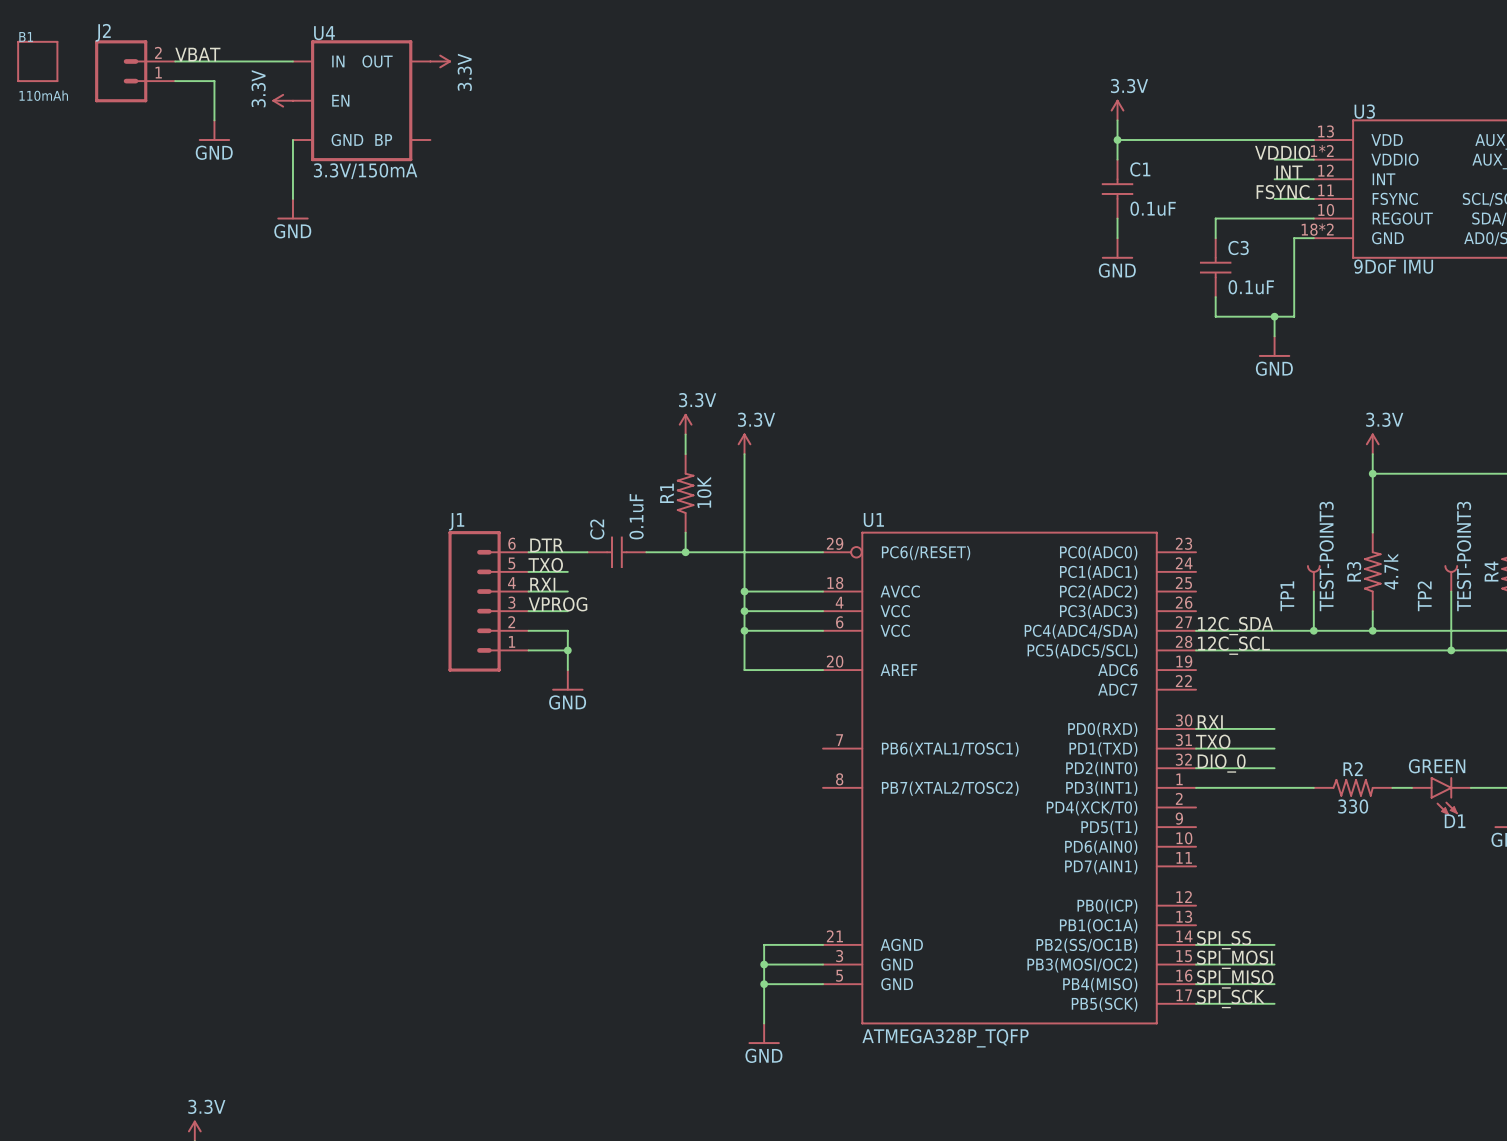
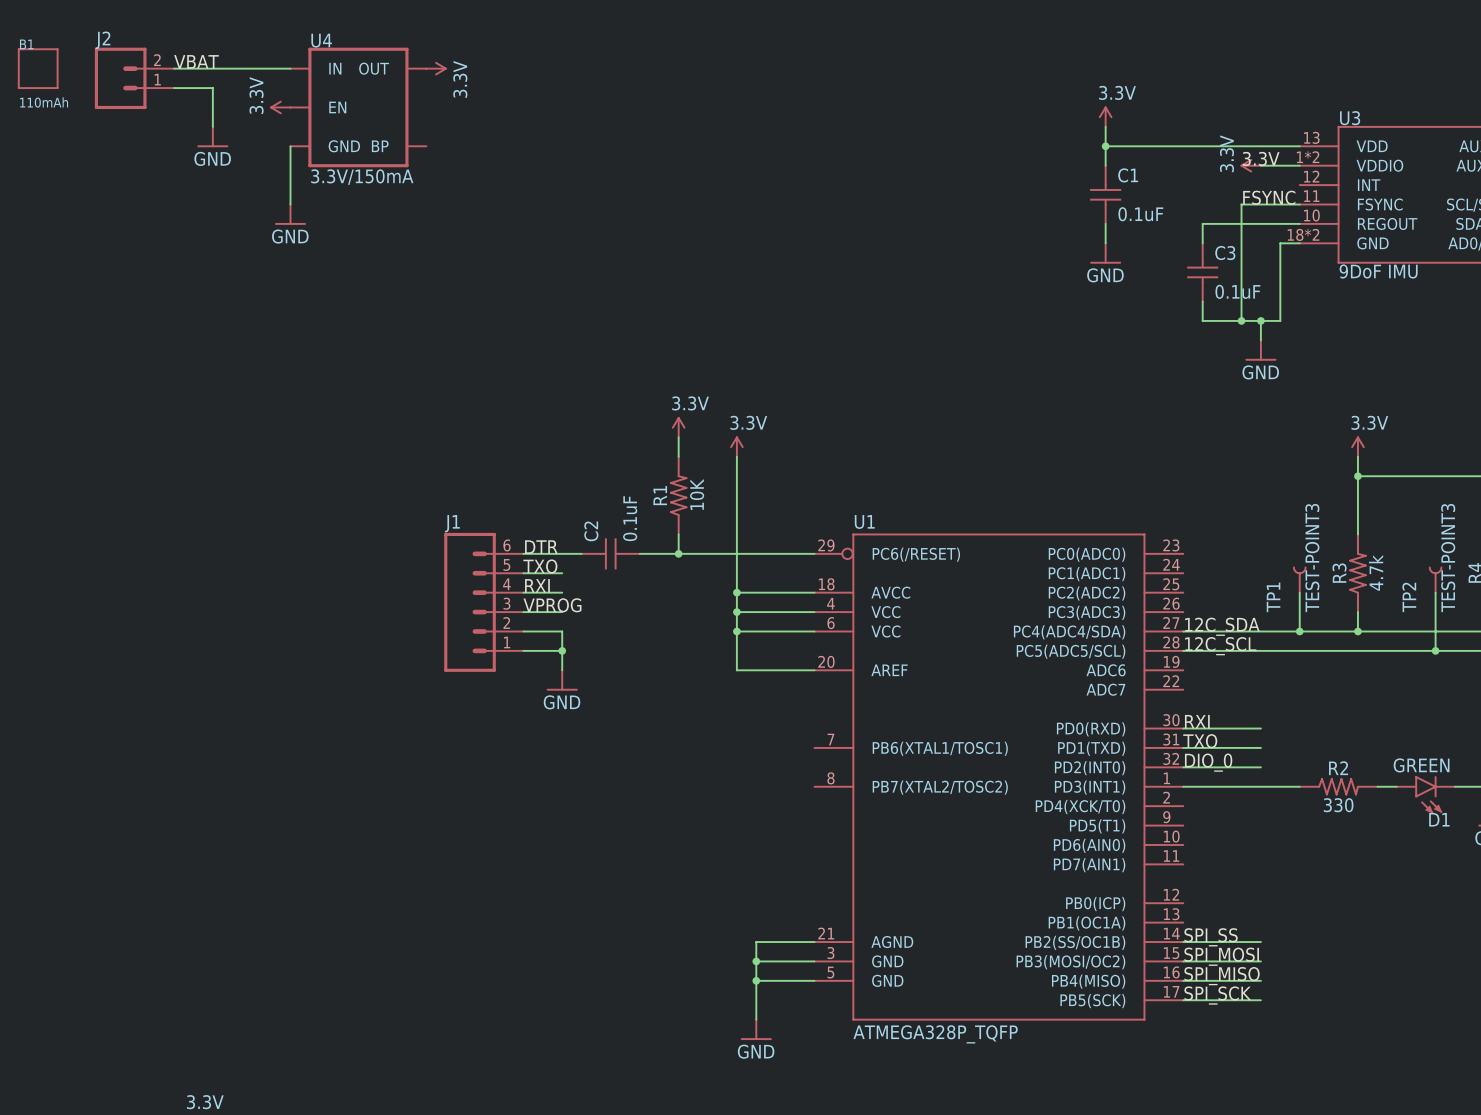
label: VDDIO (1282, 152) -> 3.3V (1261, 158)
power symbol: none -> 3.3V (1250, 165)
label: INT (1289, 172) -> none
wire: (1274, 179) (1313, 179) -> none
wire: none -> (1260, 204) (1241, 204) (1241, 320)
junction: none -> (1241, 320)

